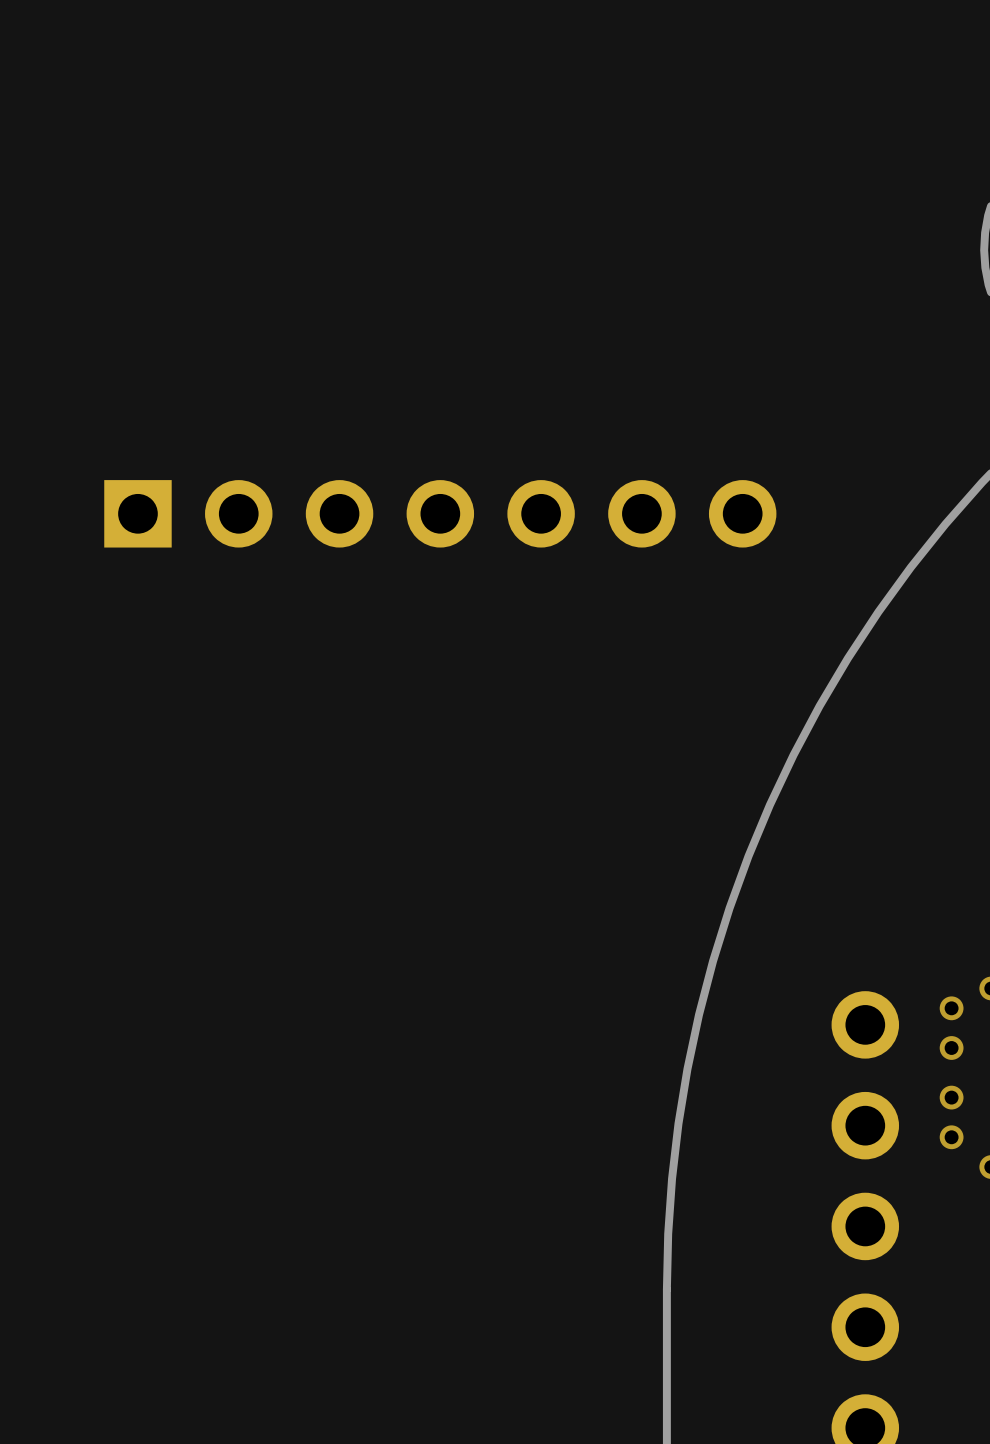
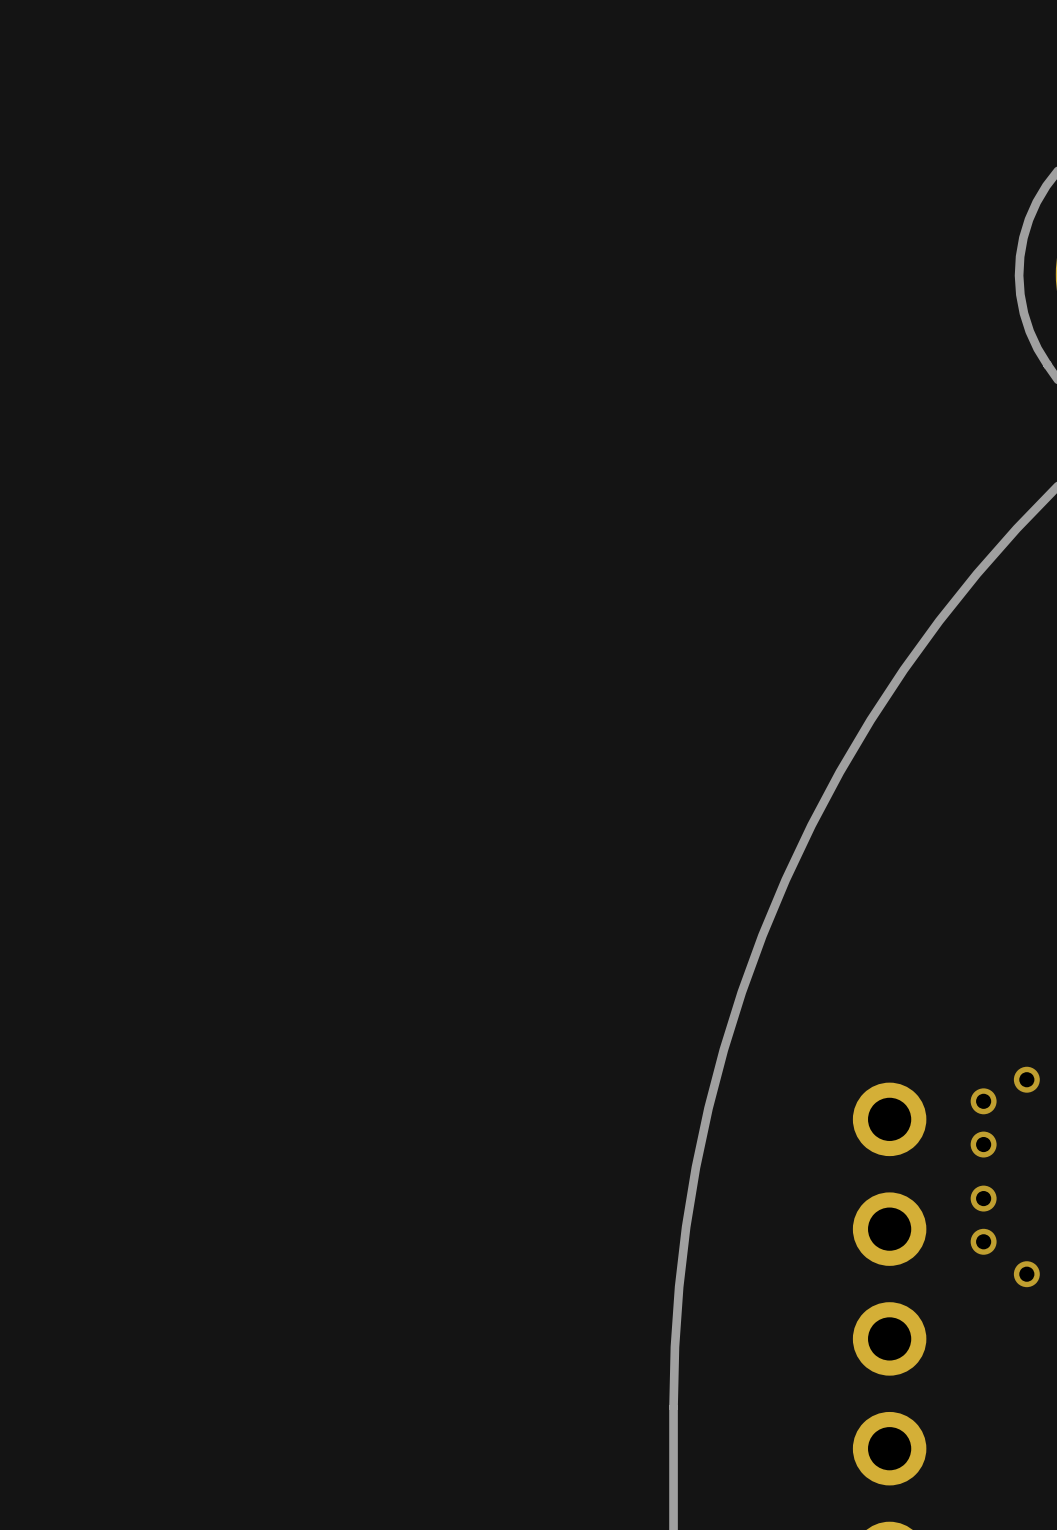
part: (440, 513) -> none

